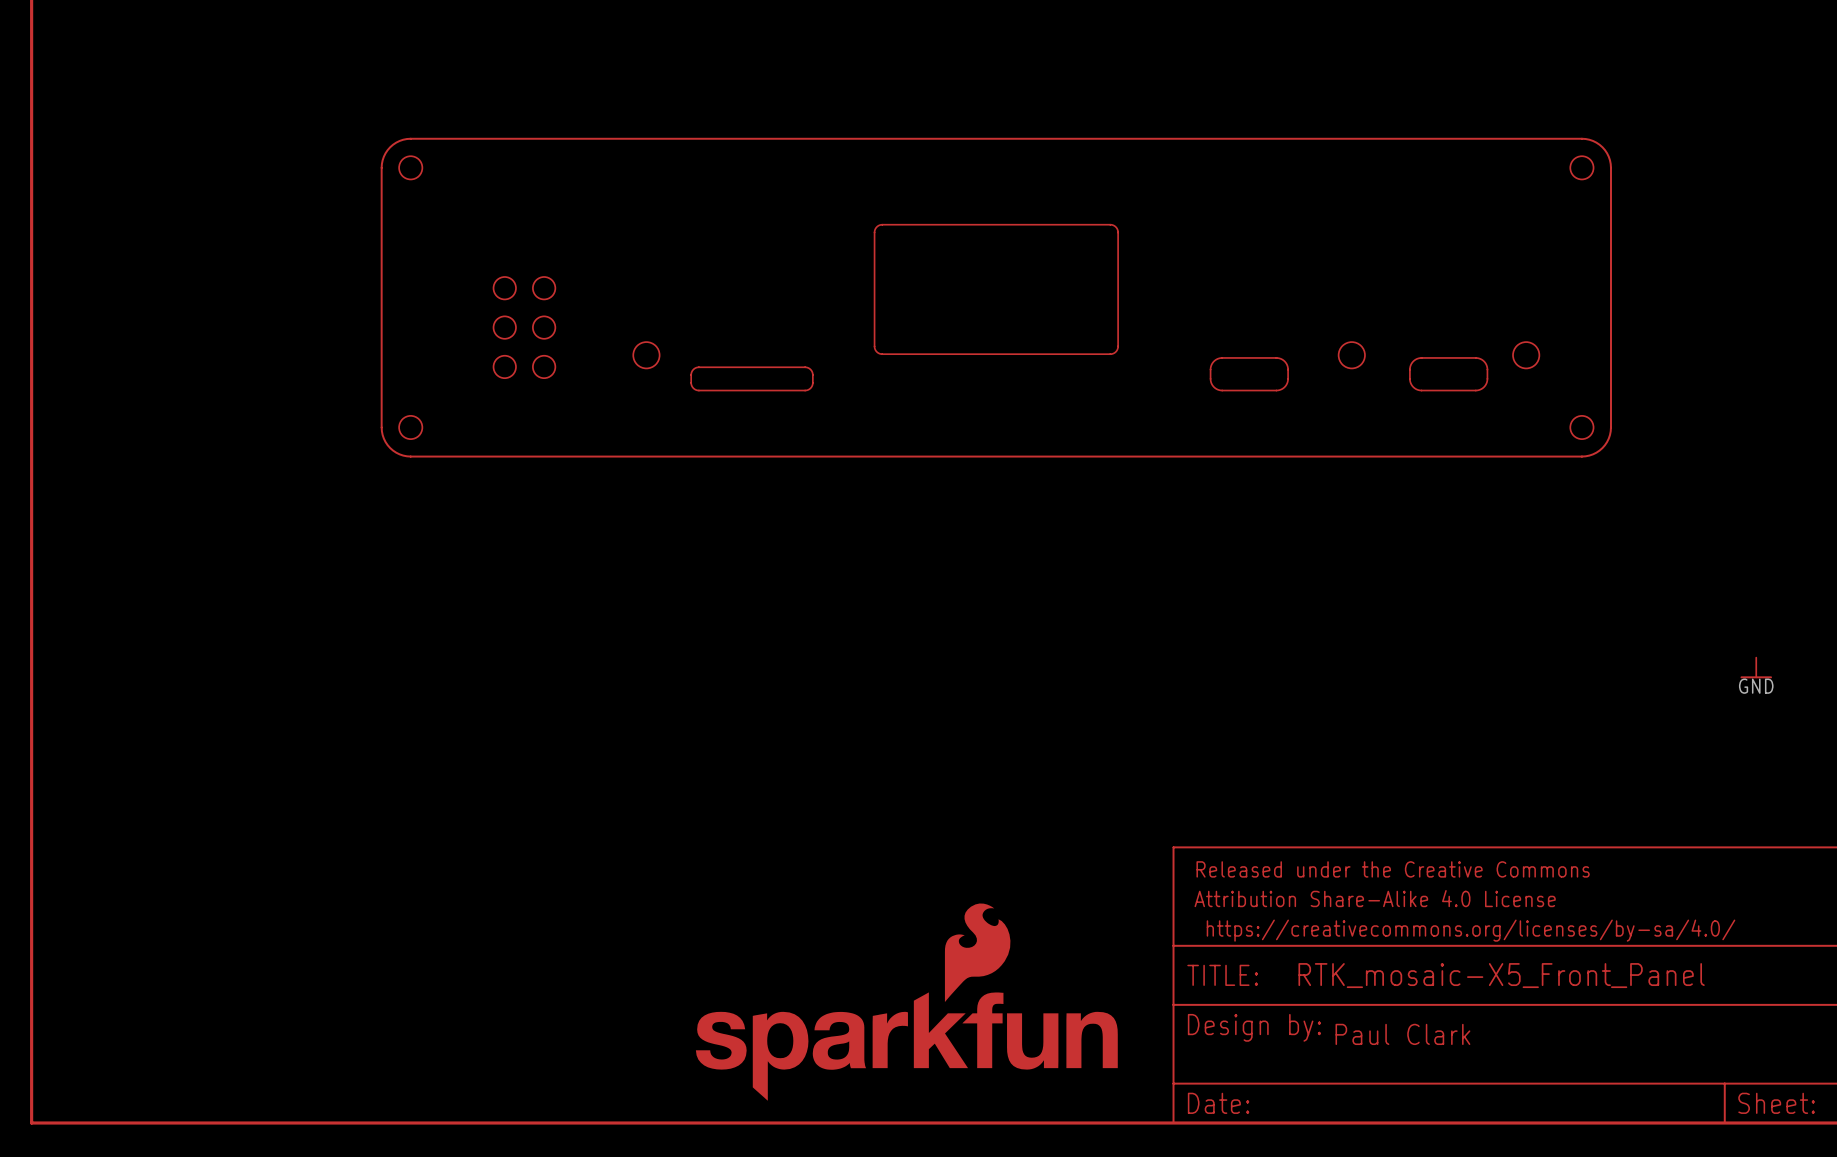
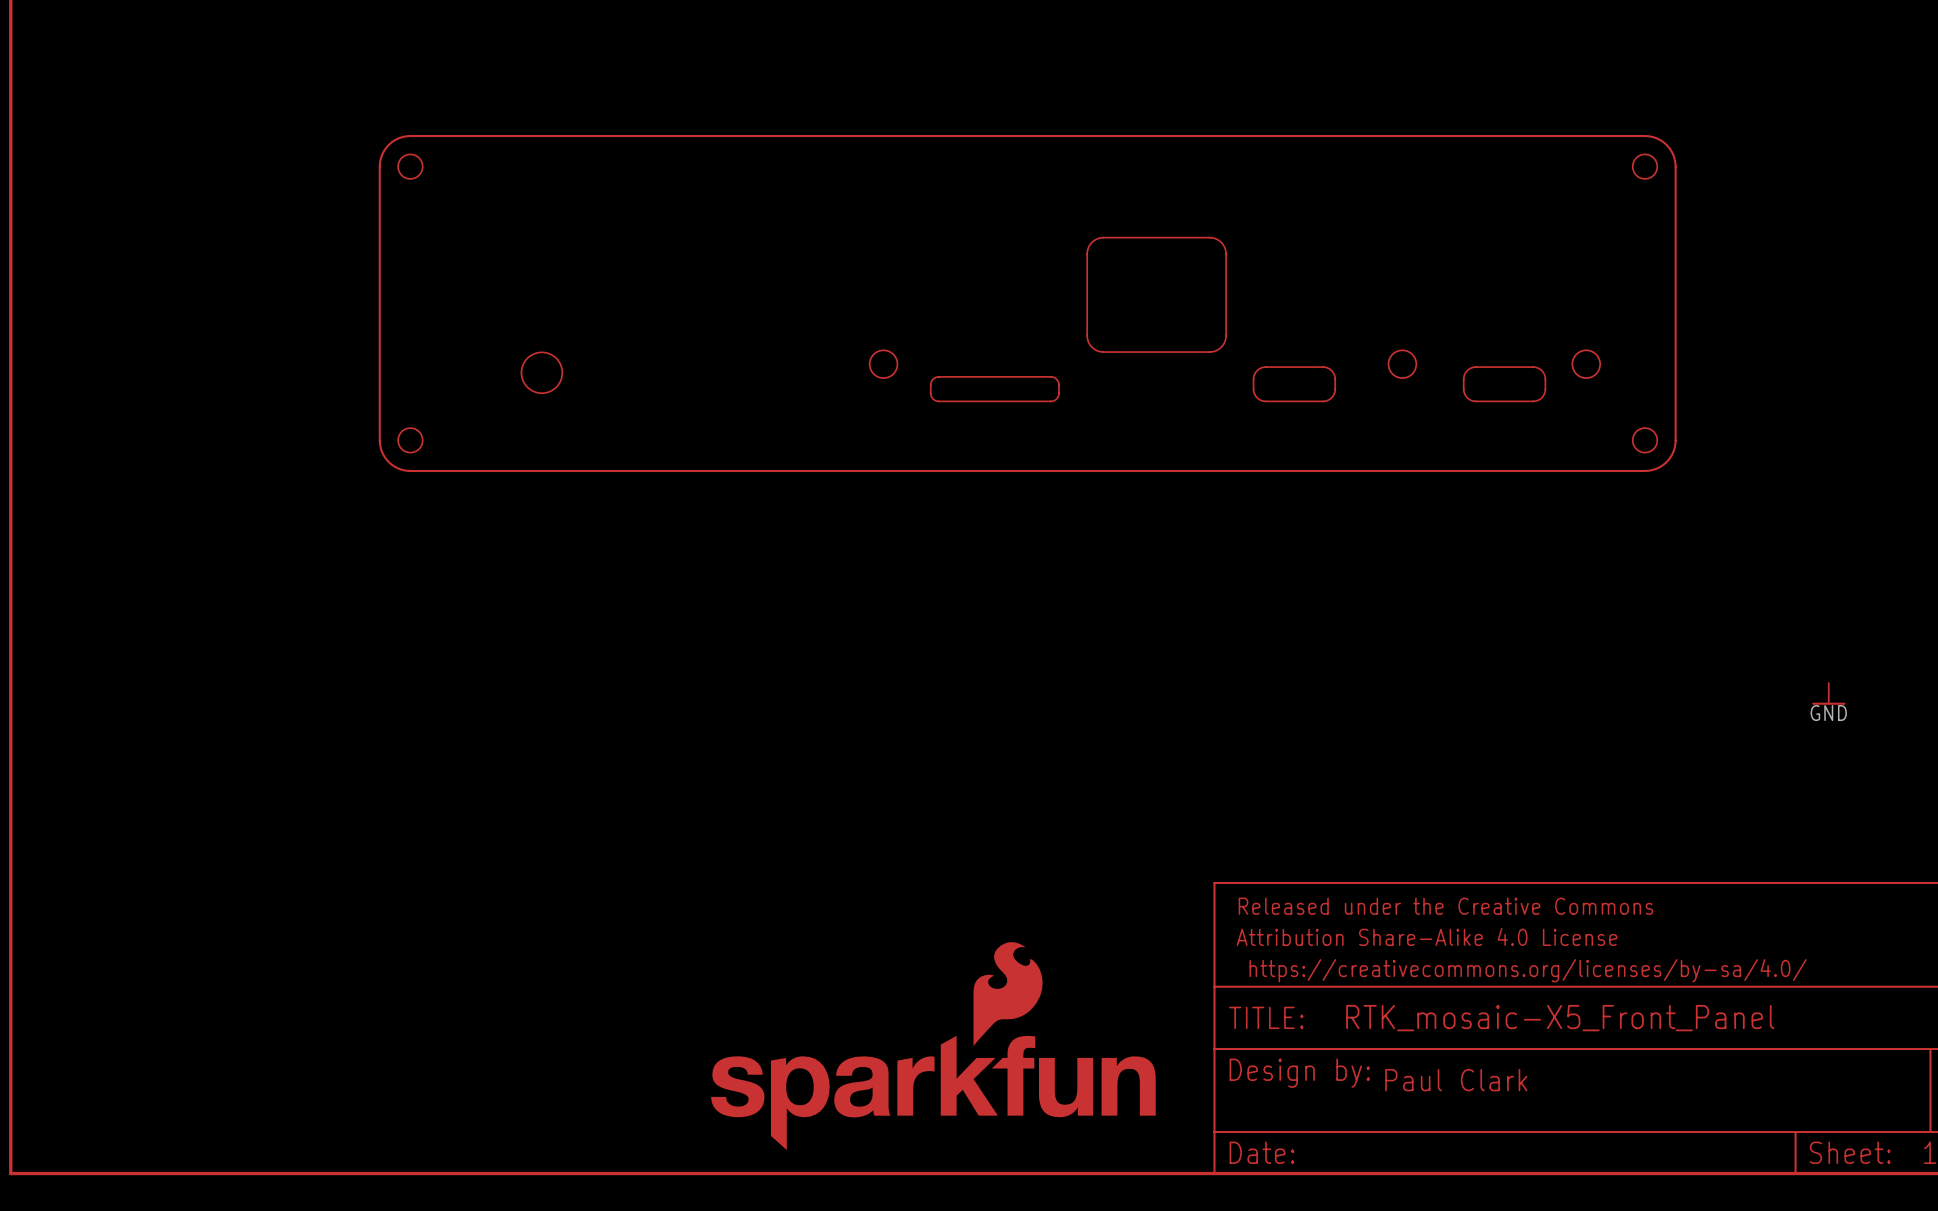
part: (996, 289) -> none
part: none -> (1156, 294)
part: (504, 327) -> none
part: (544, 327) -> none
part: (646, 355) -> none
part: none -> (883, 364)
part: none -> (541, 372)
part: (752, 378) -> none
part: none -> (994, 389)

